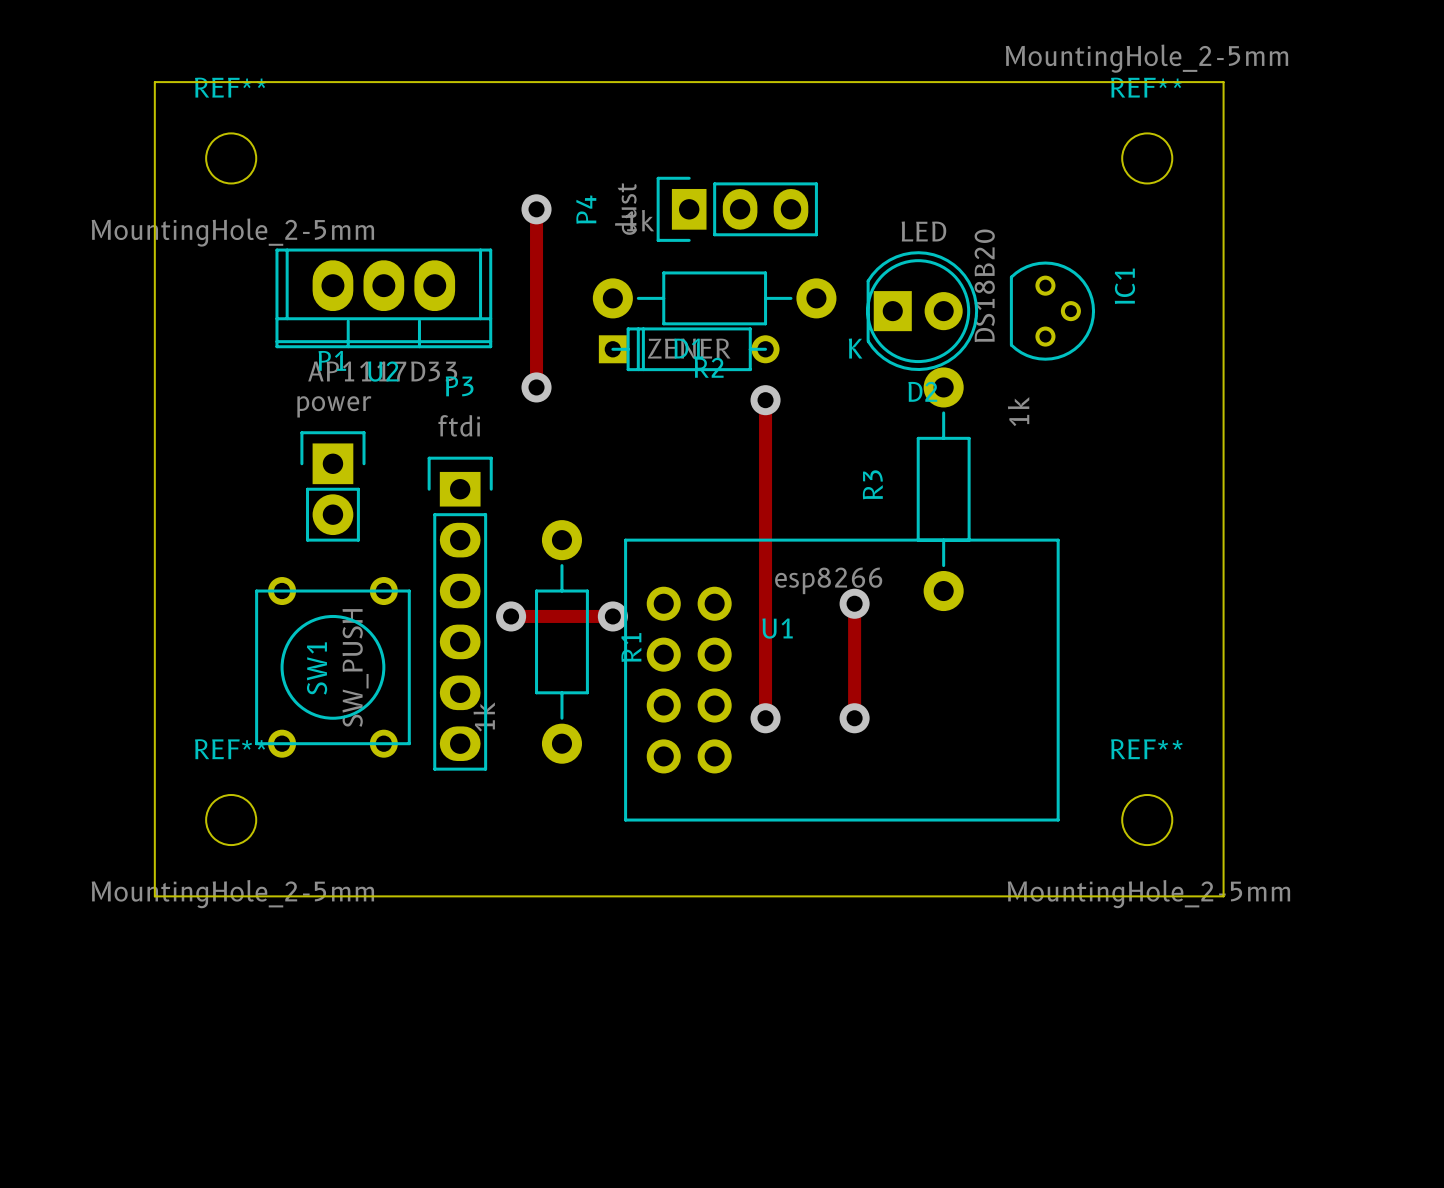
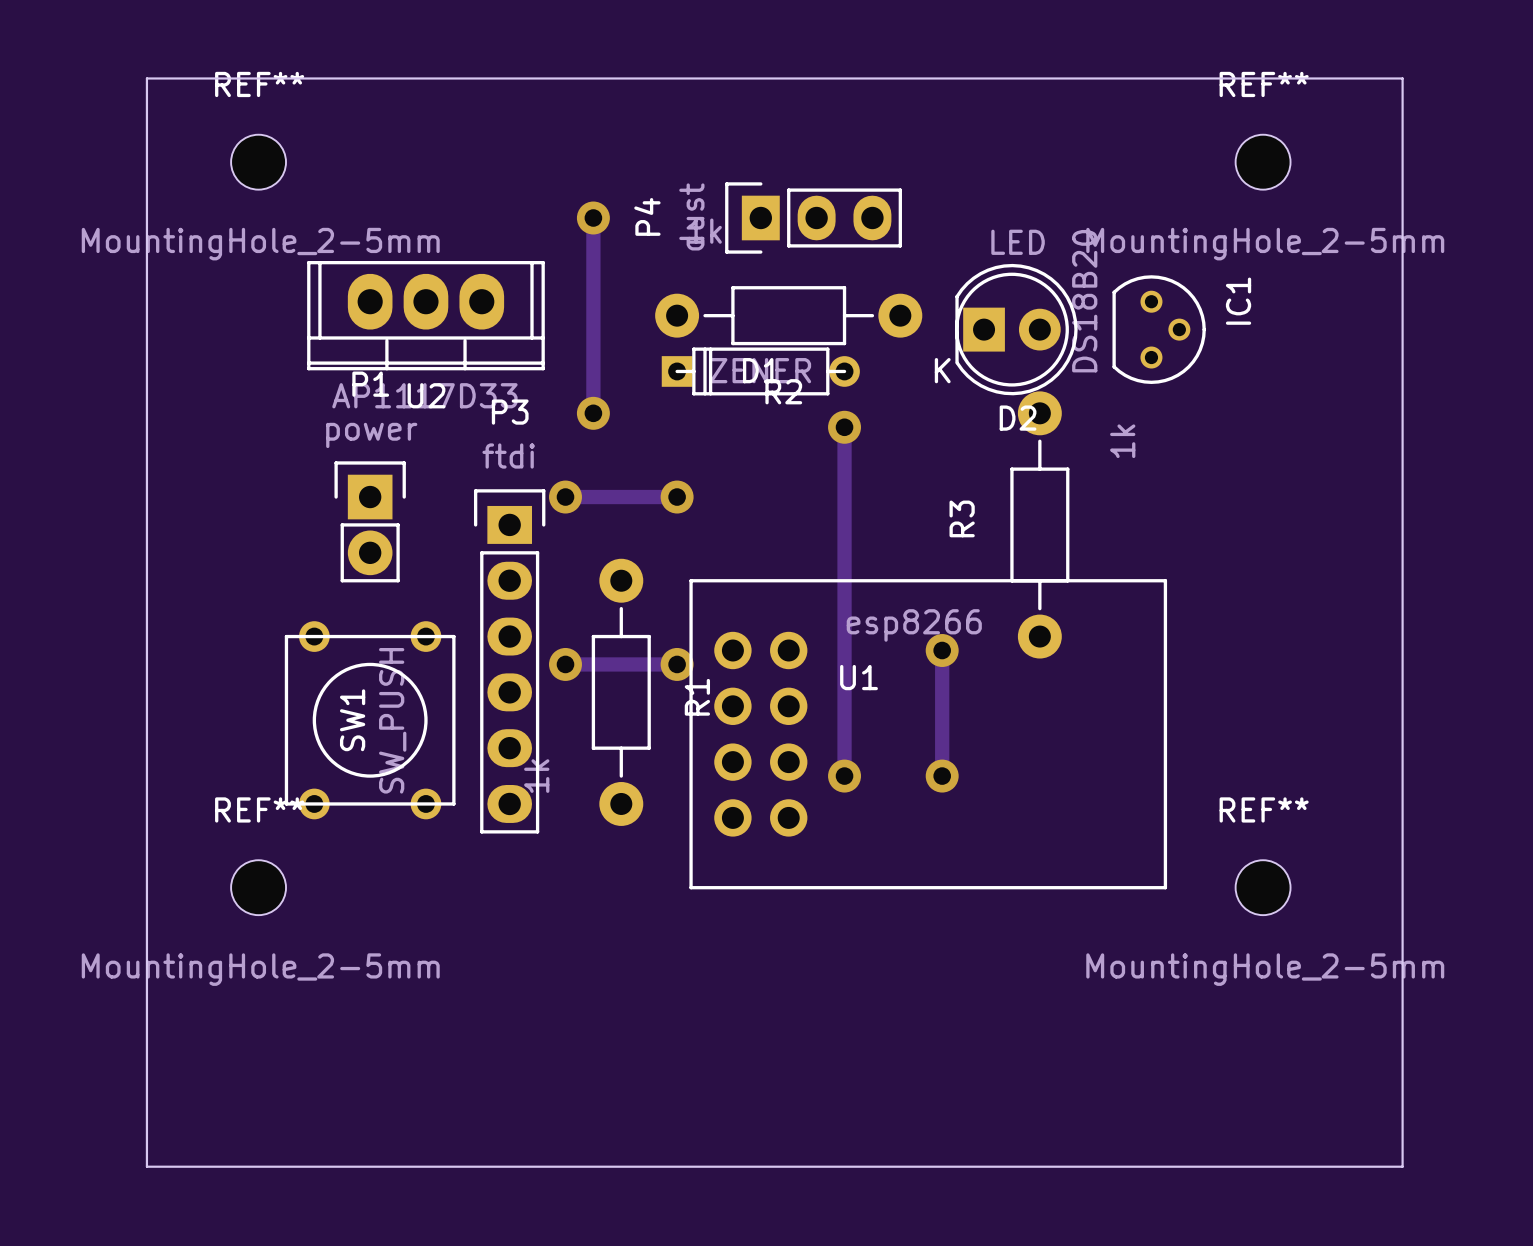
REF** value position: MountingHole_2-5mm (1146, 58) -> MountingHole_2-5mm (1265, 244)
board edge: (154, 82) (154, 896) (1223, 896) (1223, 82) -> (174, 78) (146, 78) (146, 1166) (1402, 1166) (1402, 78) (1346, 78)
track: none -> (565, 497) (677, 497)
via: none -> (565, 497)
via: none -> (677, 497)

